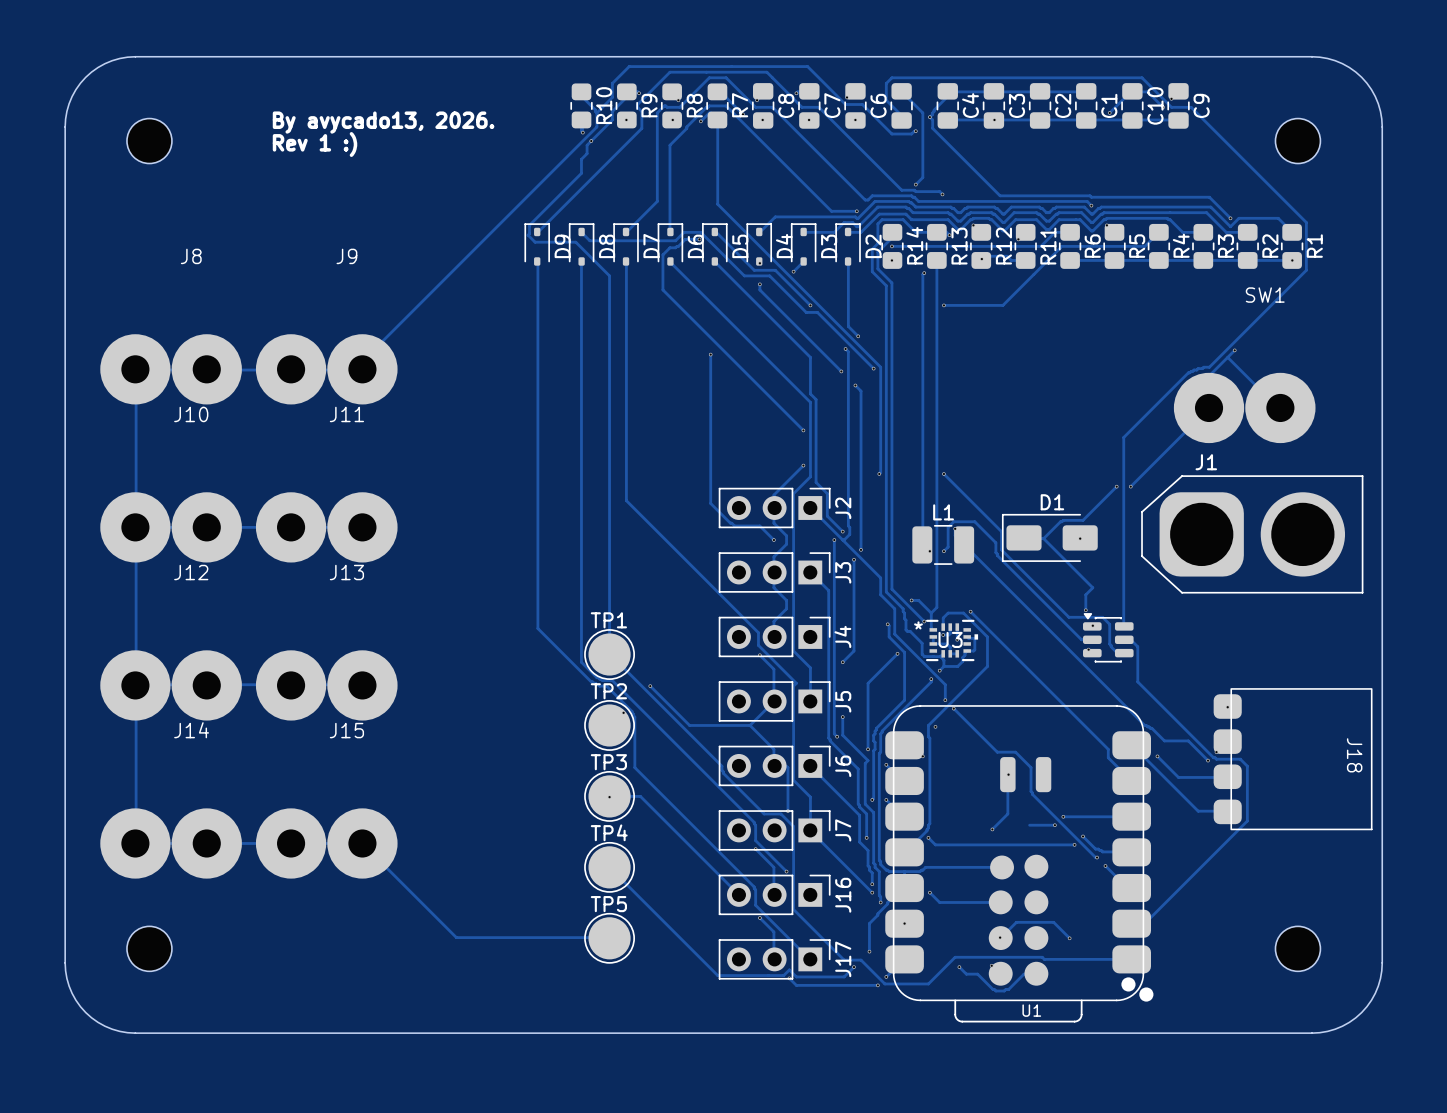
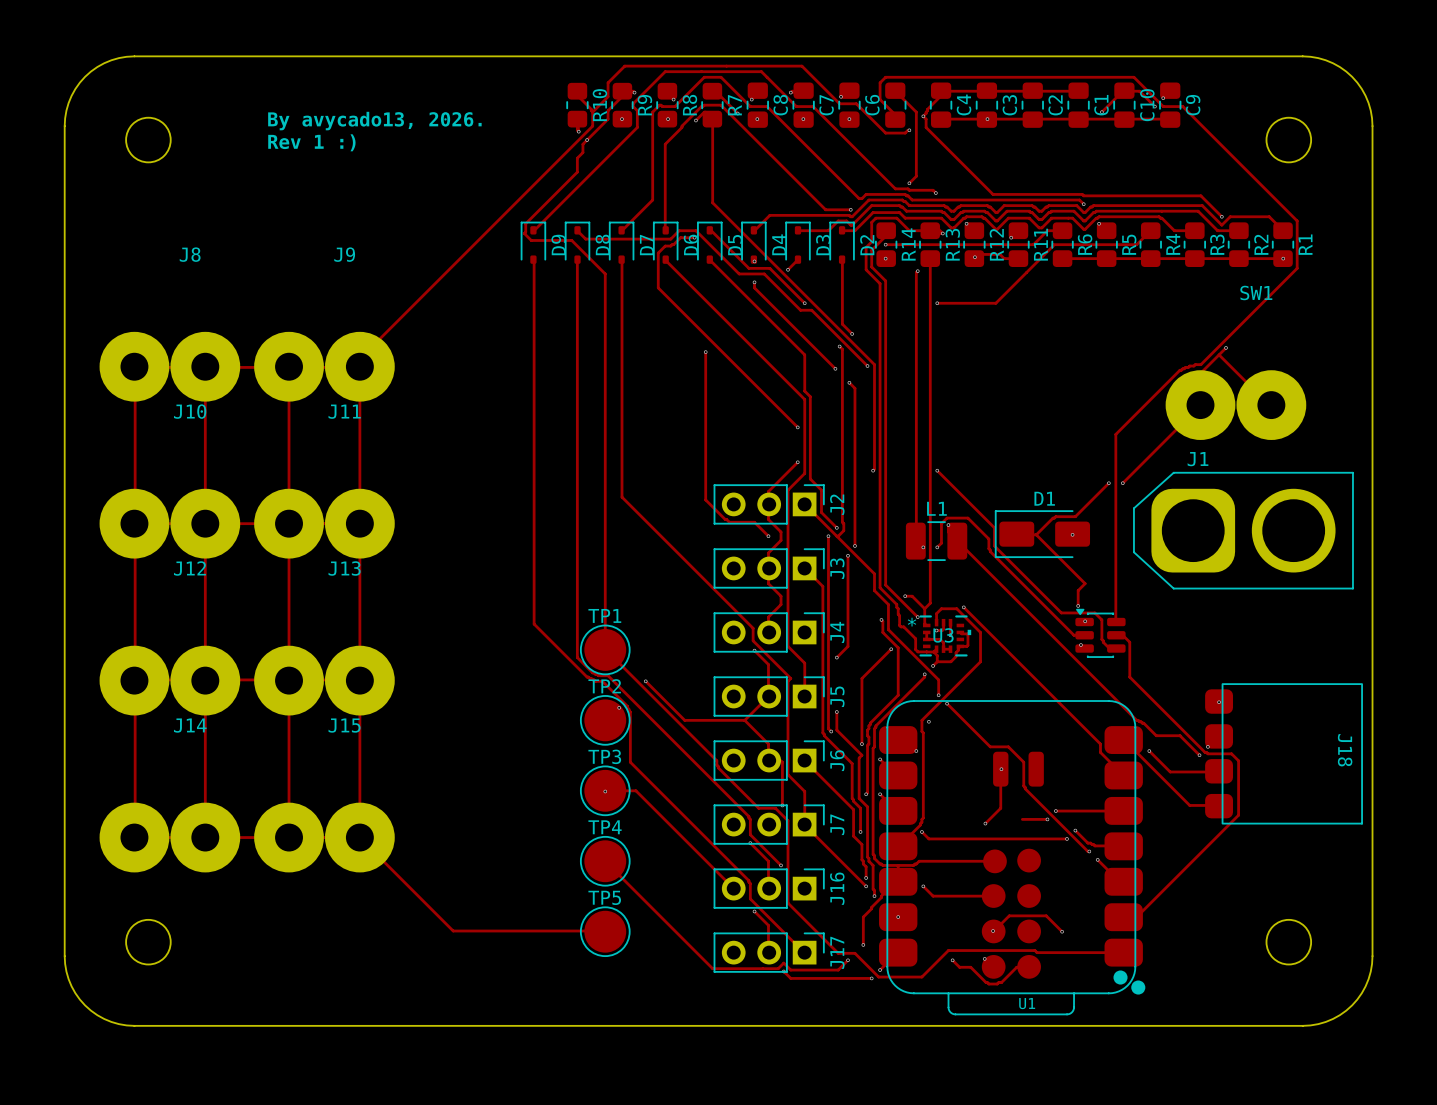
track: none -> (205, 366) (205, 837)
track: none -> (289, 366) (289, 837)
track: none -> (359, 366) (359, 837)

